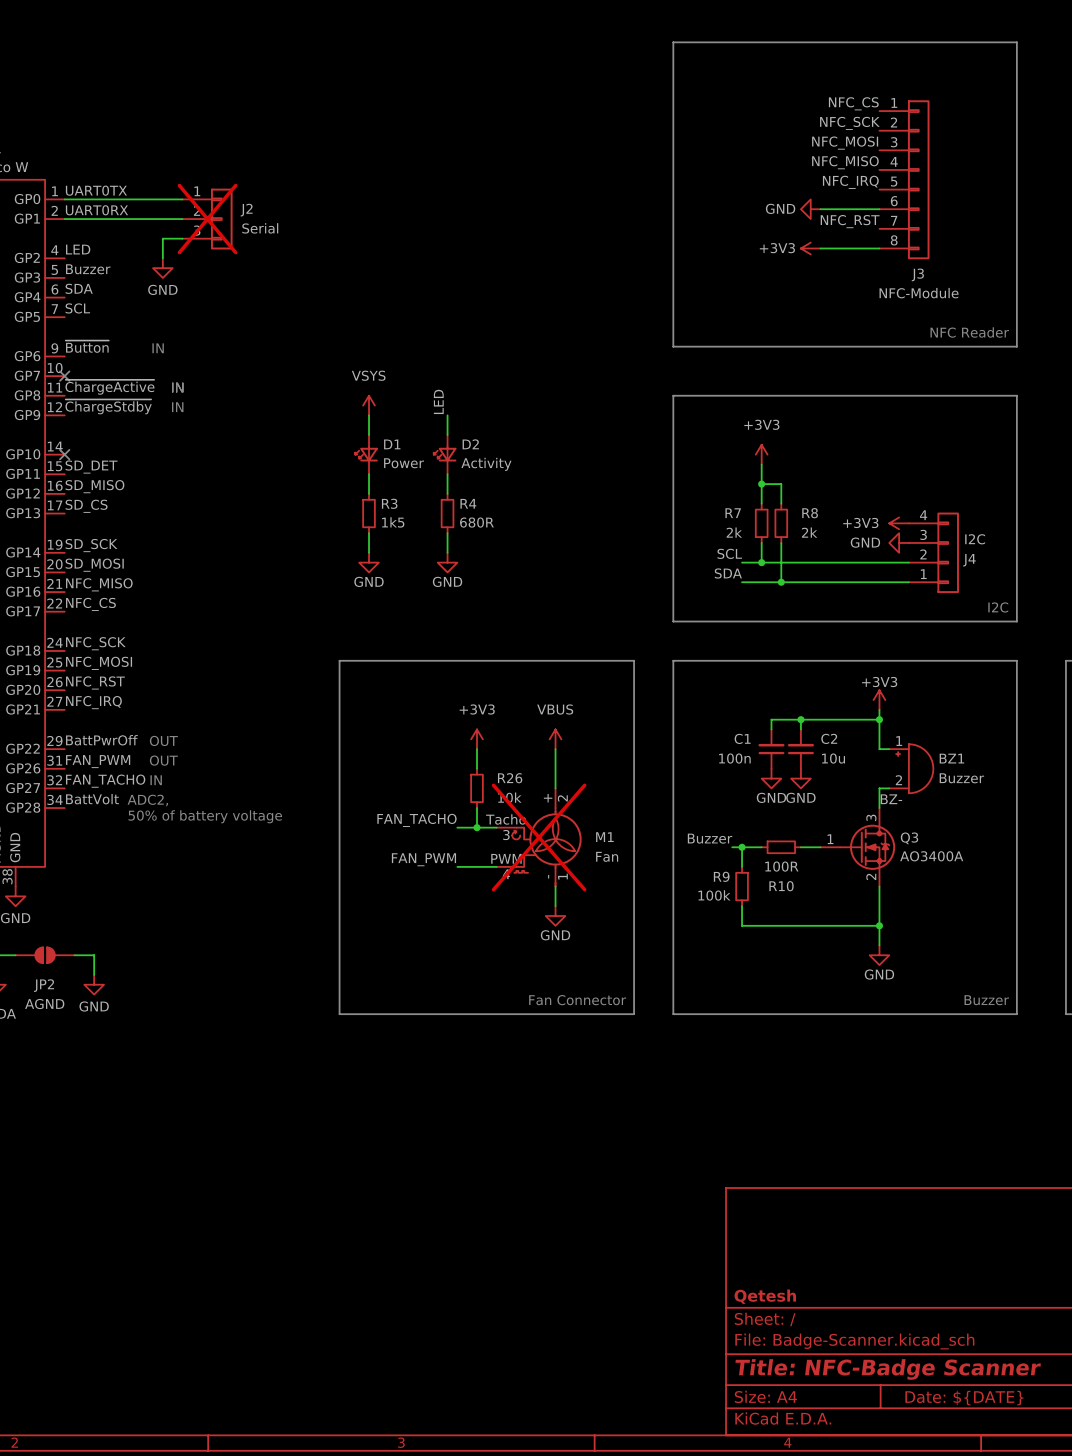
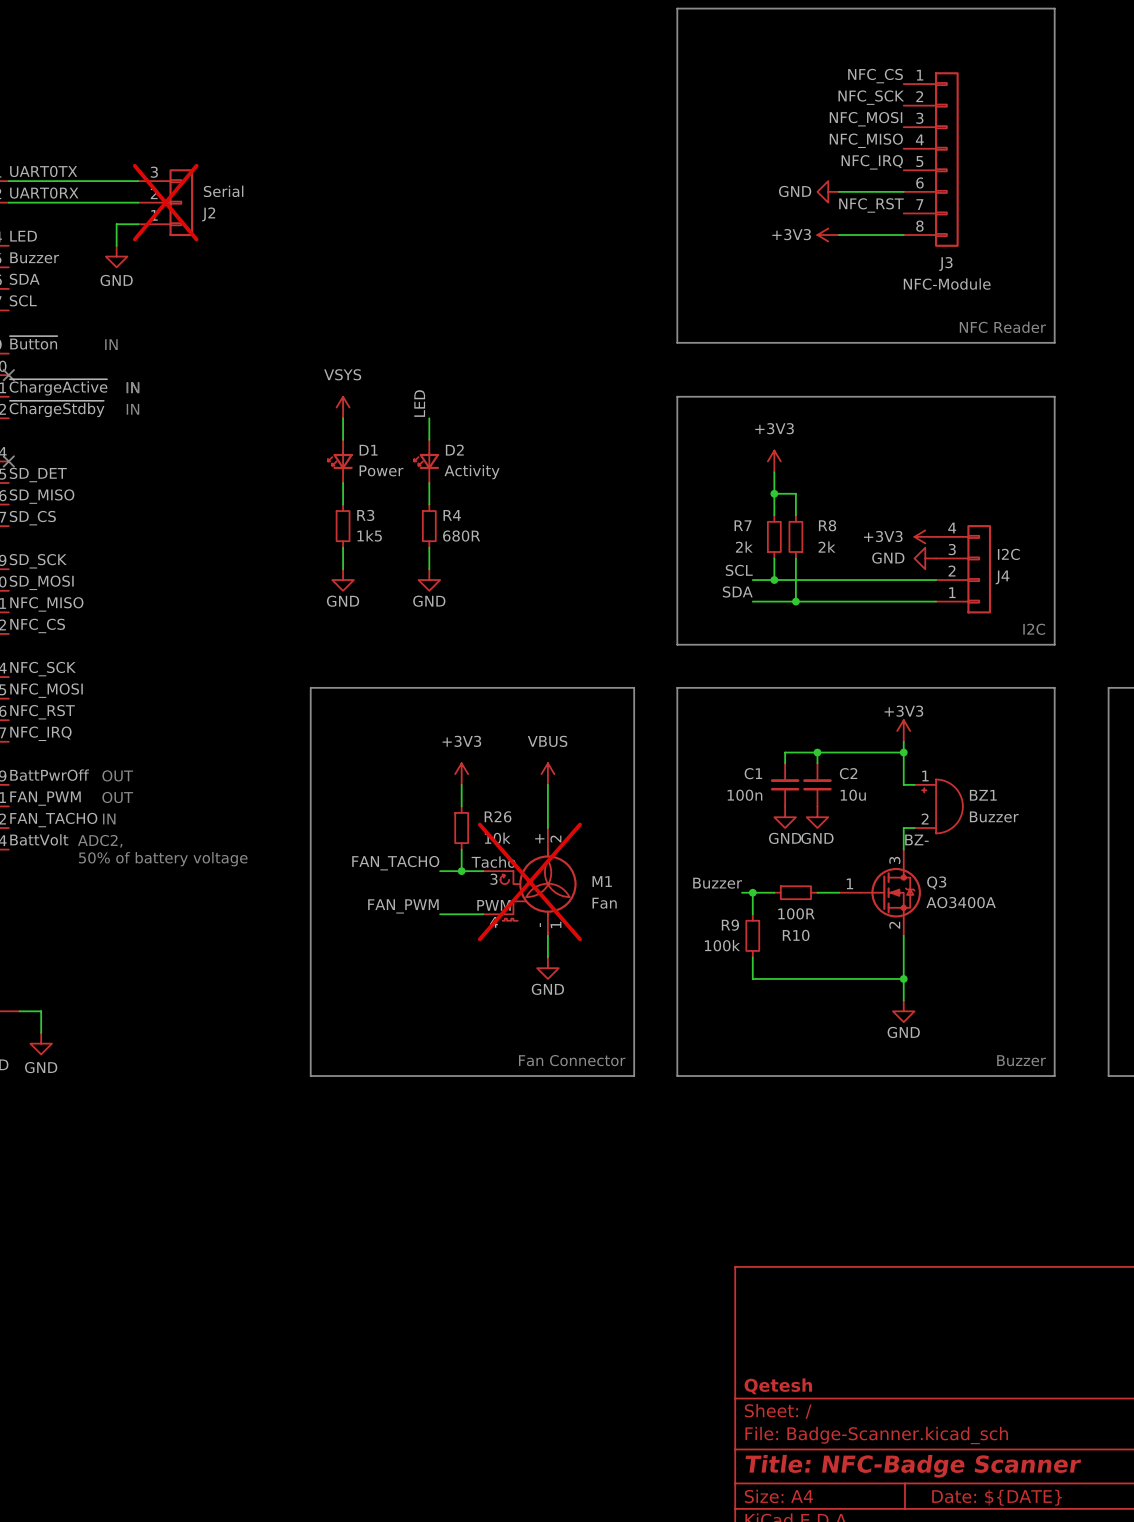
J2 flip: as is (221, 219) -> up-down (181, 202)

